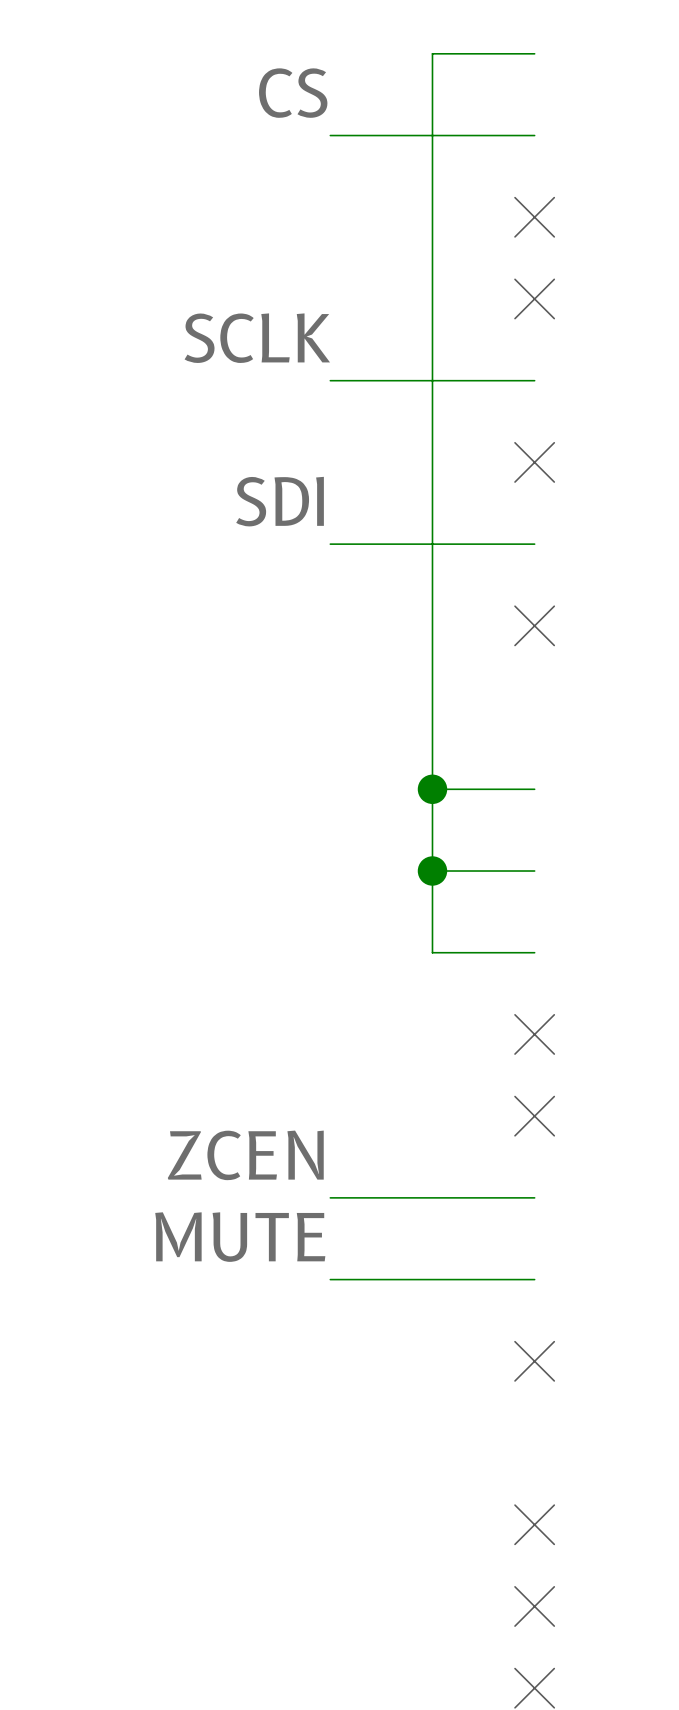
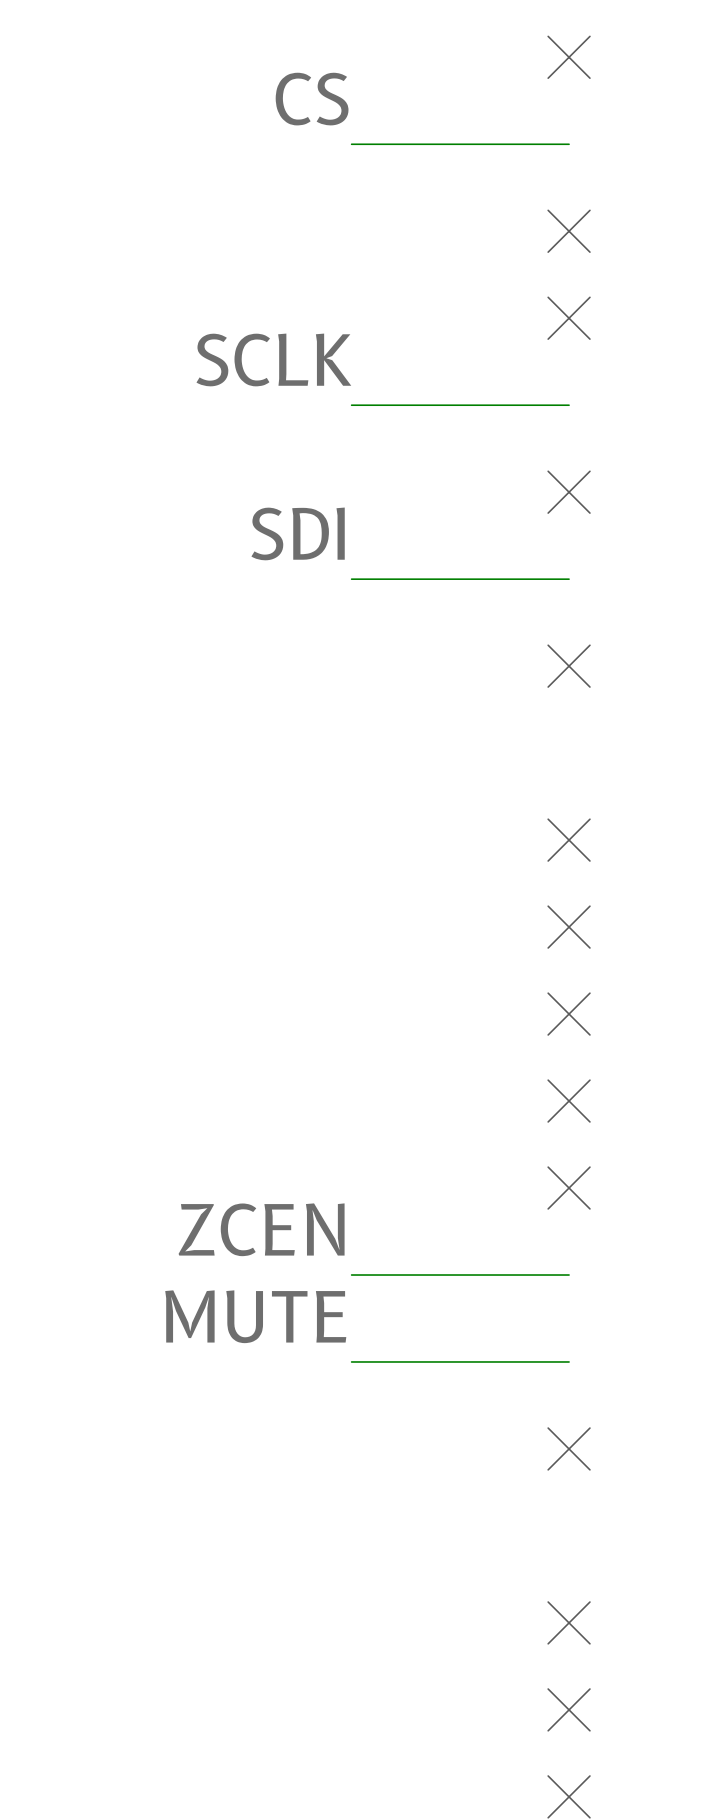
wire: (534, 53) (432, 53) (432, 952) (534, 952) -> none
no-connect mark: none -> (569, 57)
wire: (432, 789) (534, 789) -> none
junction: (432, 789) -> none
no-connect mark: none -> (569, 840)
wire: (432, 871) (534, 871) -> none
junction: (432, 871) -> none
no-connect mark: none -> (569, 927)
no-connect mark: none -> (569, 1014)

